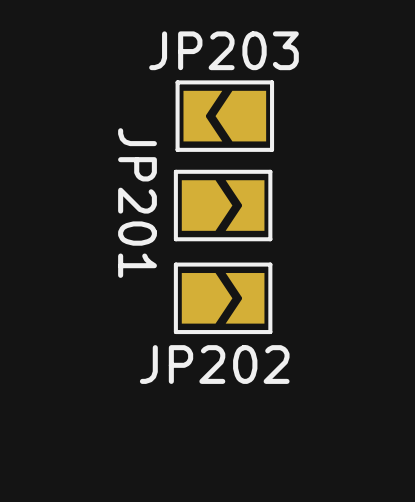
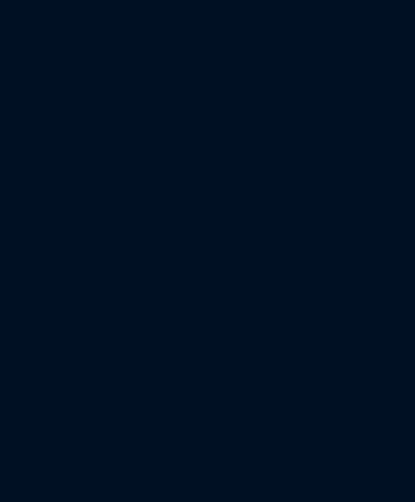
JP203: (224, 116) -> none
JP201: (223, 205) -> none
JP202: (223, 298) -> none

